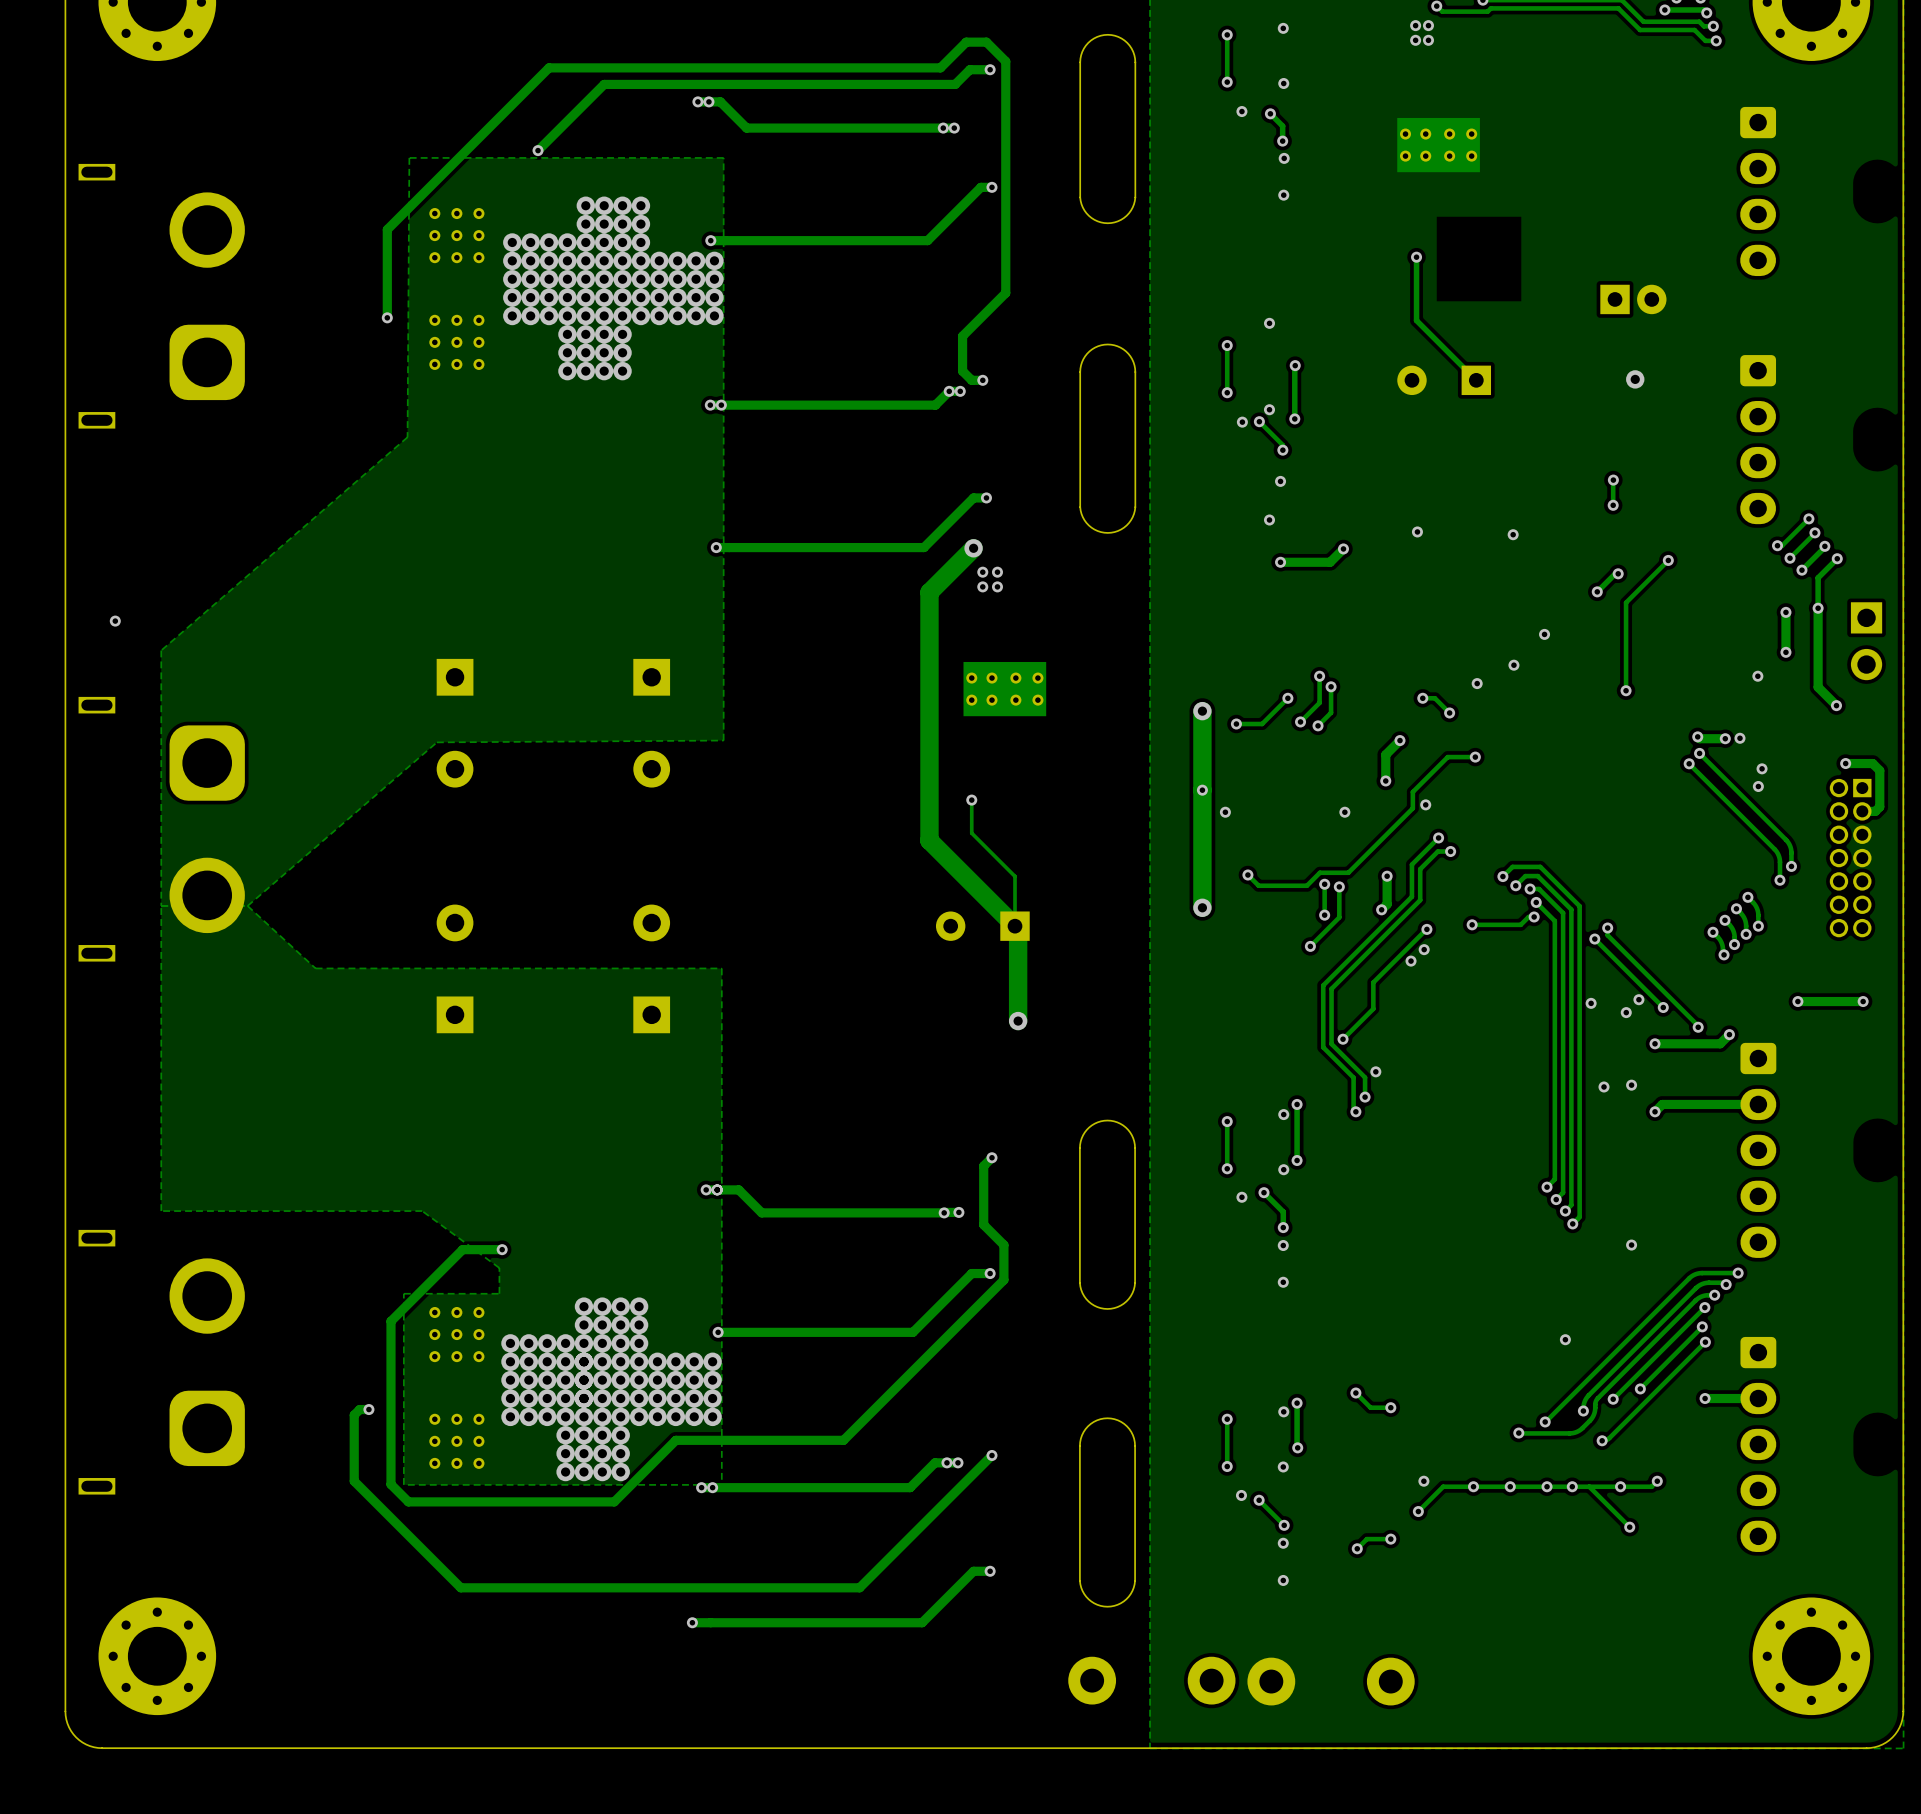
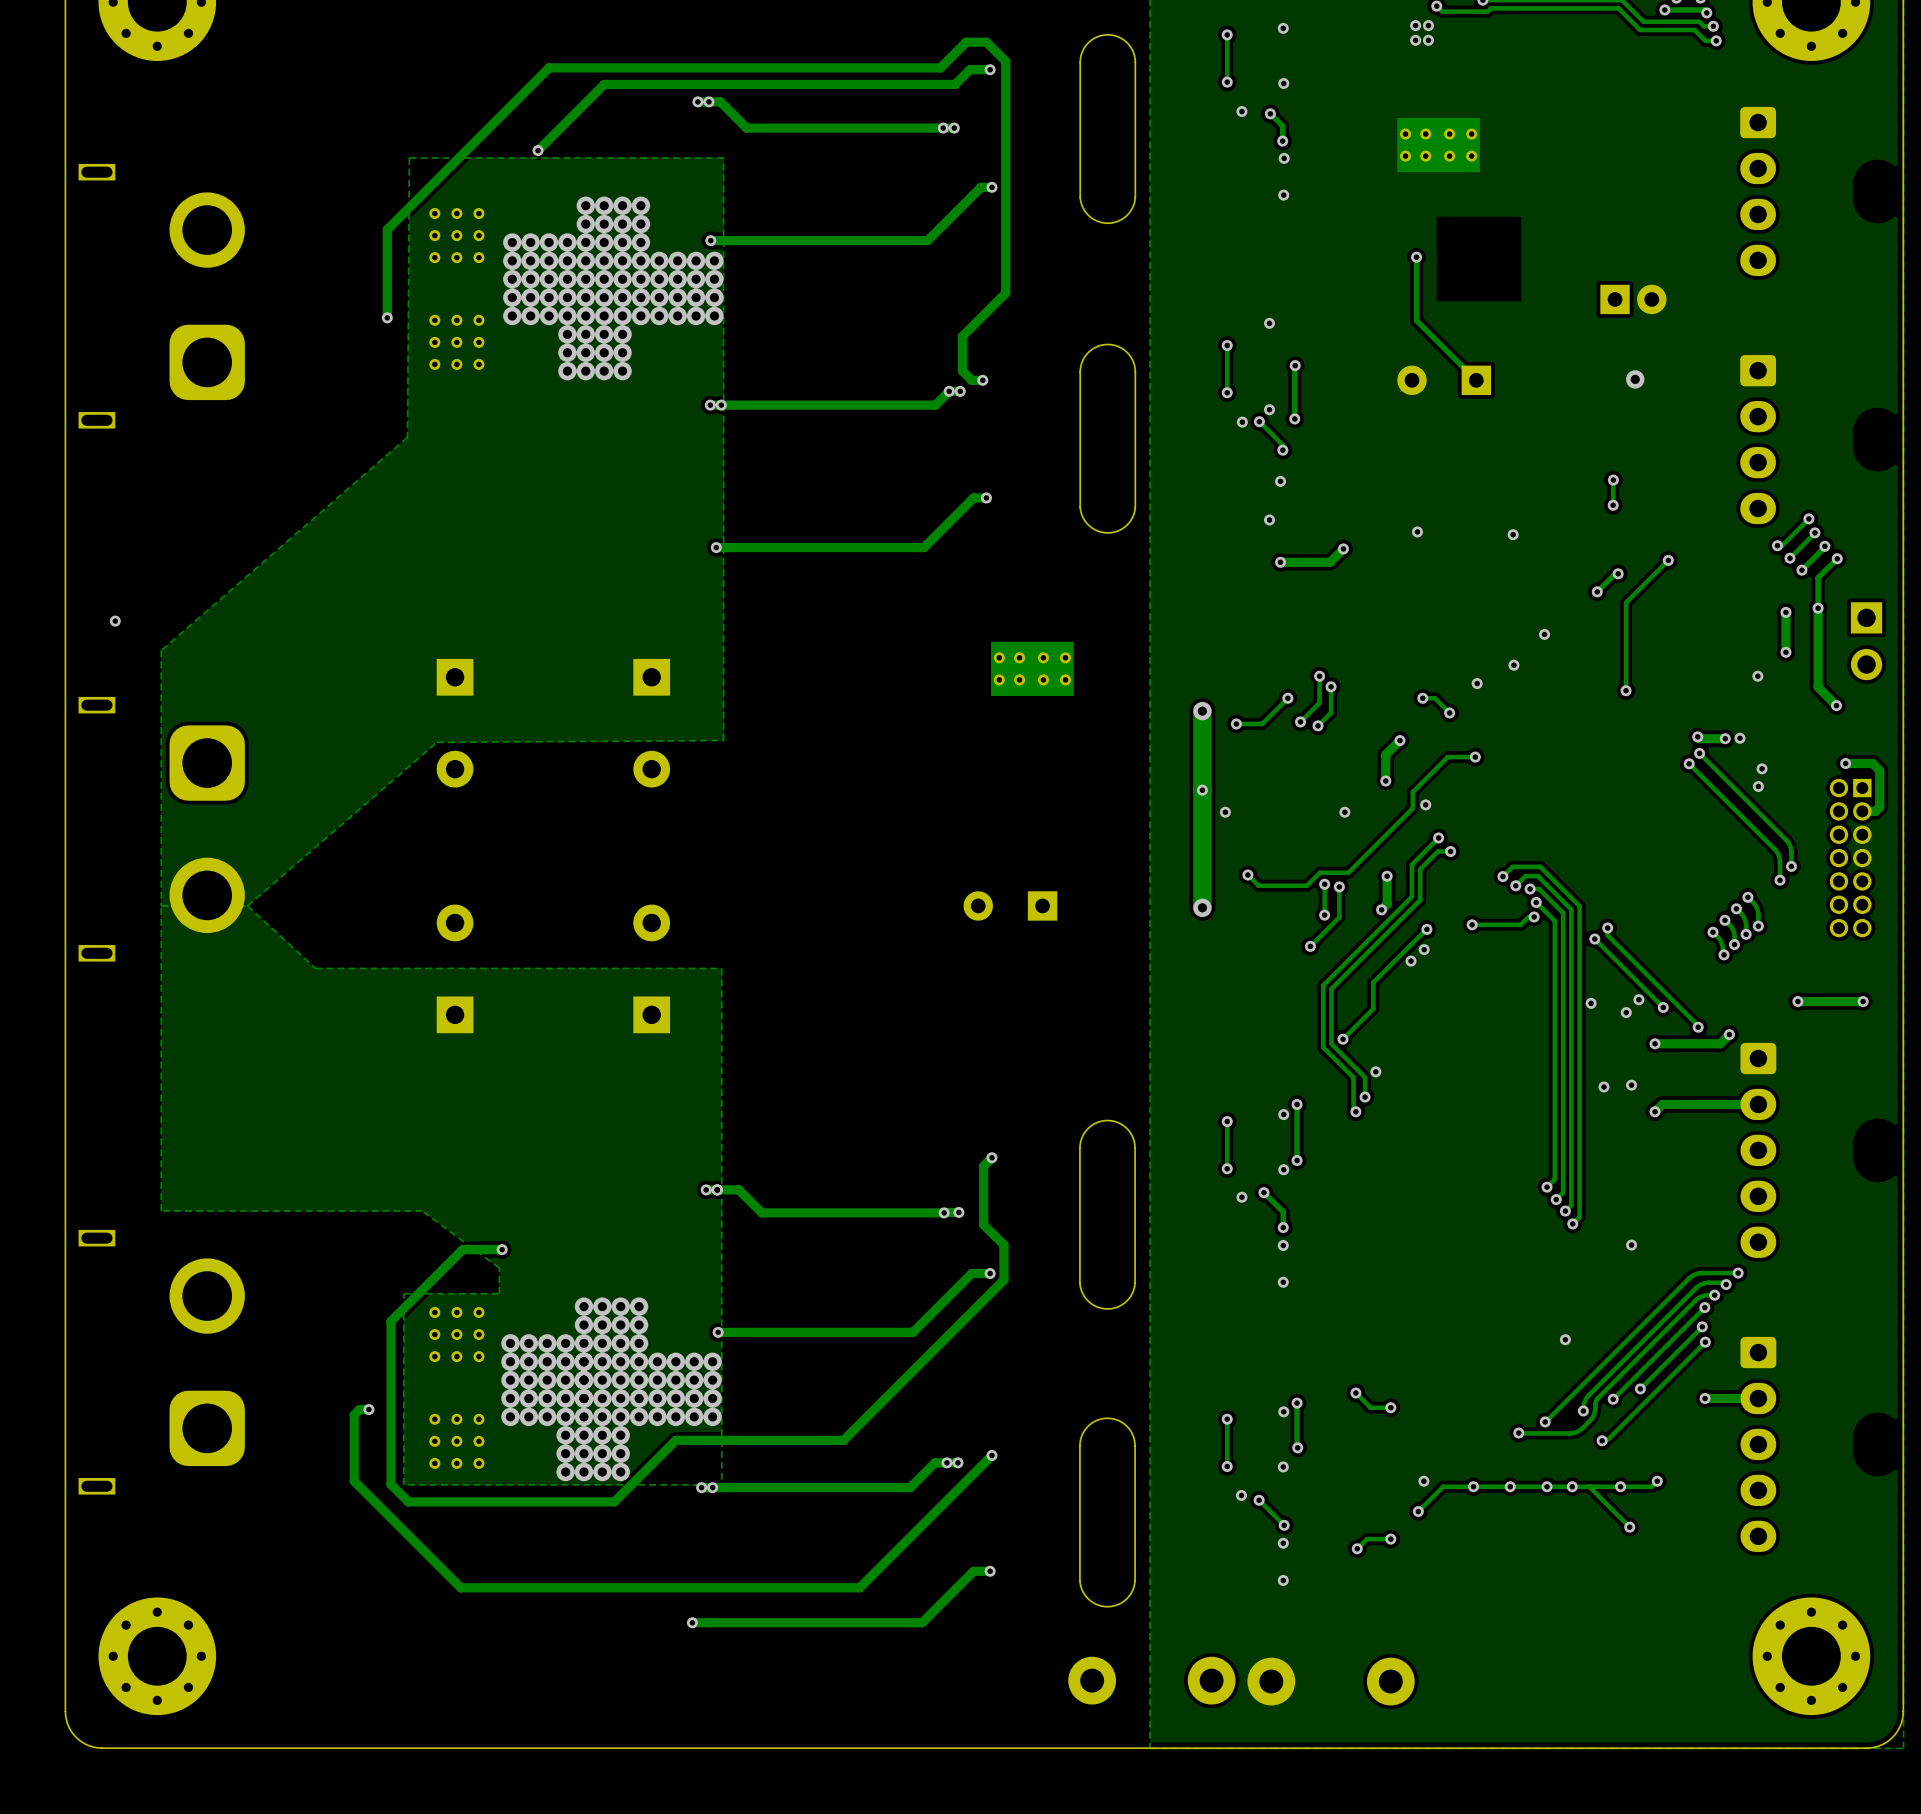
track: (973, 548) (929, 592) (929, 840) (1015, 926) -> none
via: (973, 548) -> none
via: (982, 572) -> none
via: (997, 572) -> none
via: (982, 586) -> none
via: (997, 586) -> none
part position: (1004, 689) -> (1032, 668)
track: (971, 800) (971, 833) (1015, 876) (1015, 926) -> none
via: (971, 800) -> none
part position: (982, 926) -> (1010, 905)
track: (1015, 926) (1018, 929) (1018, 1021) -> none
via: (1018, 1021) -> none

